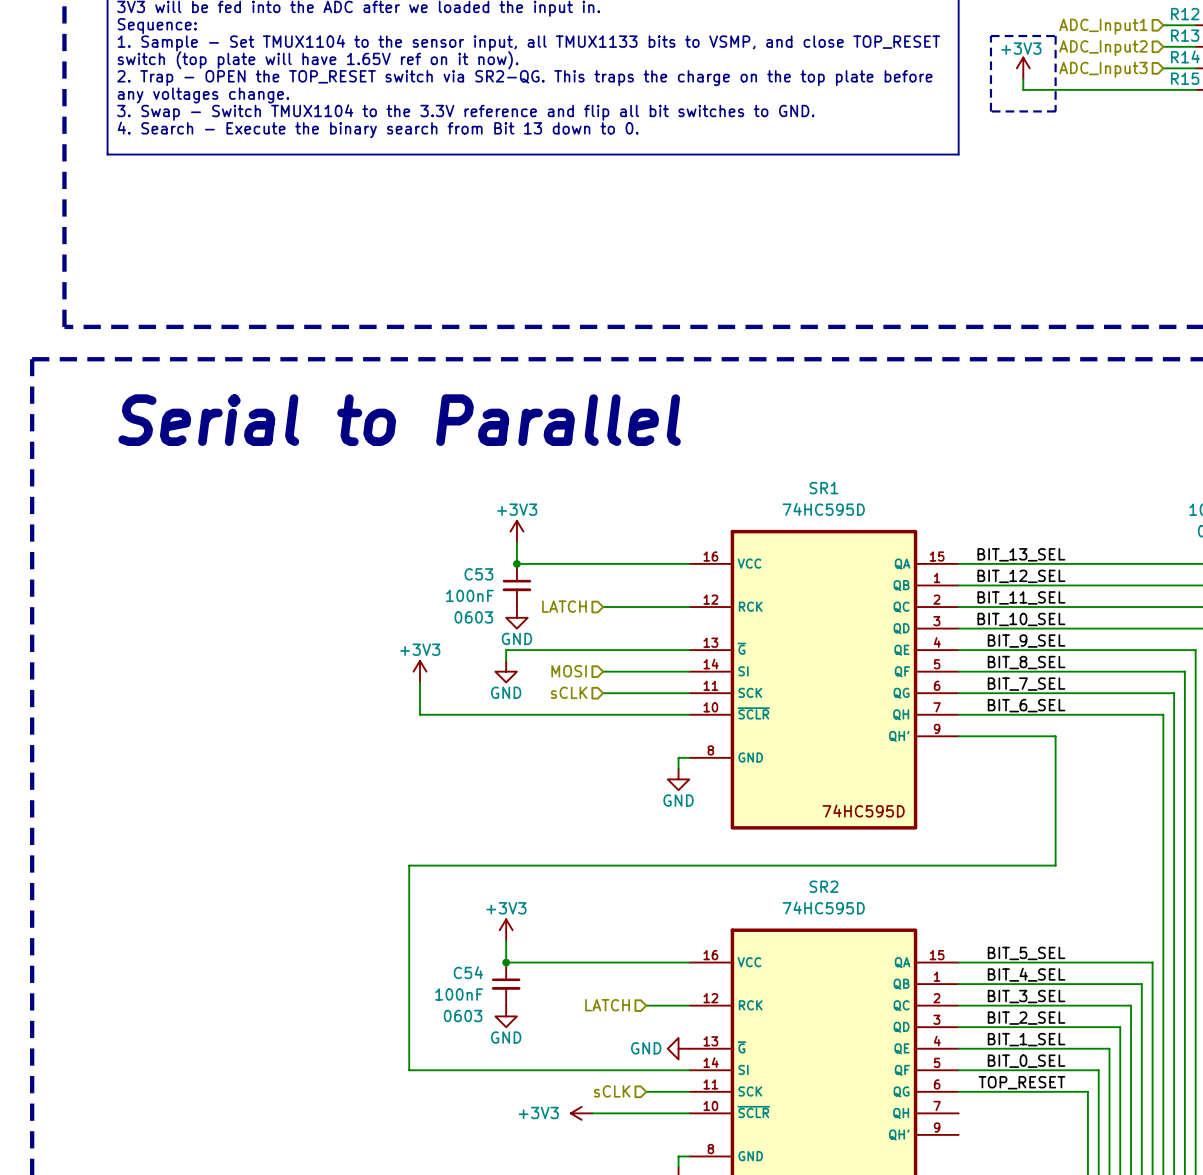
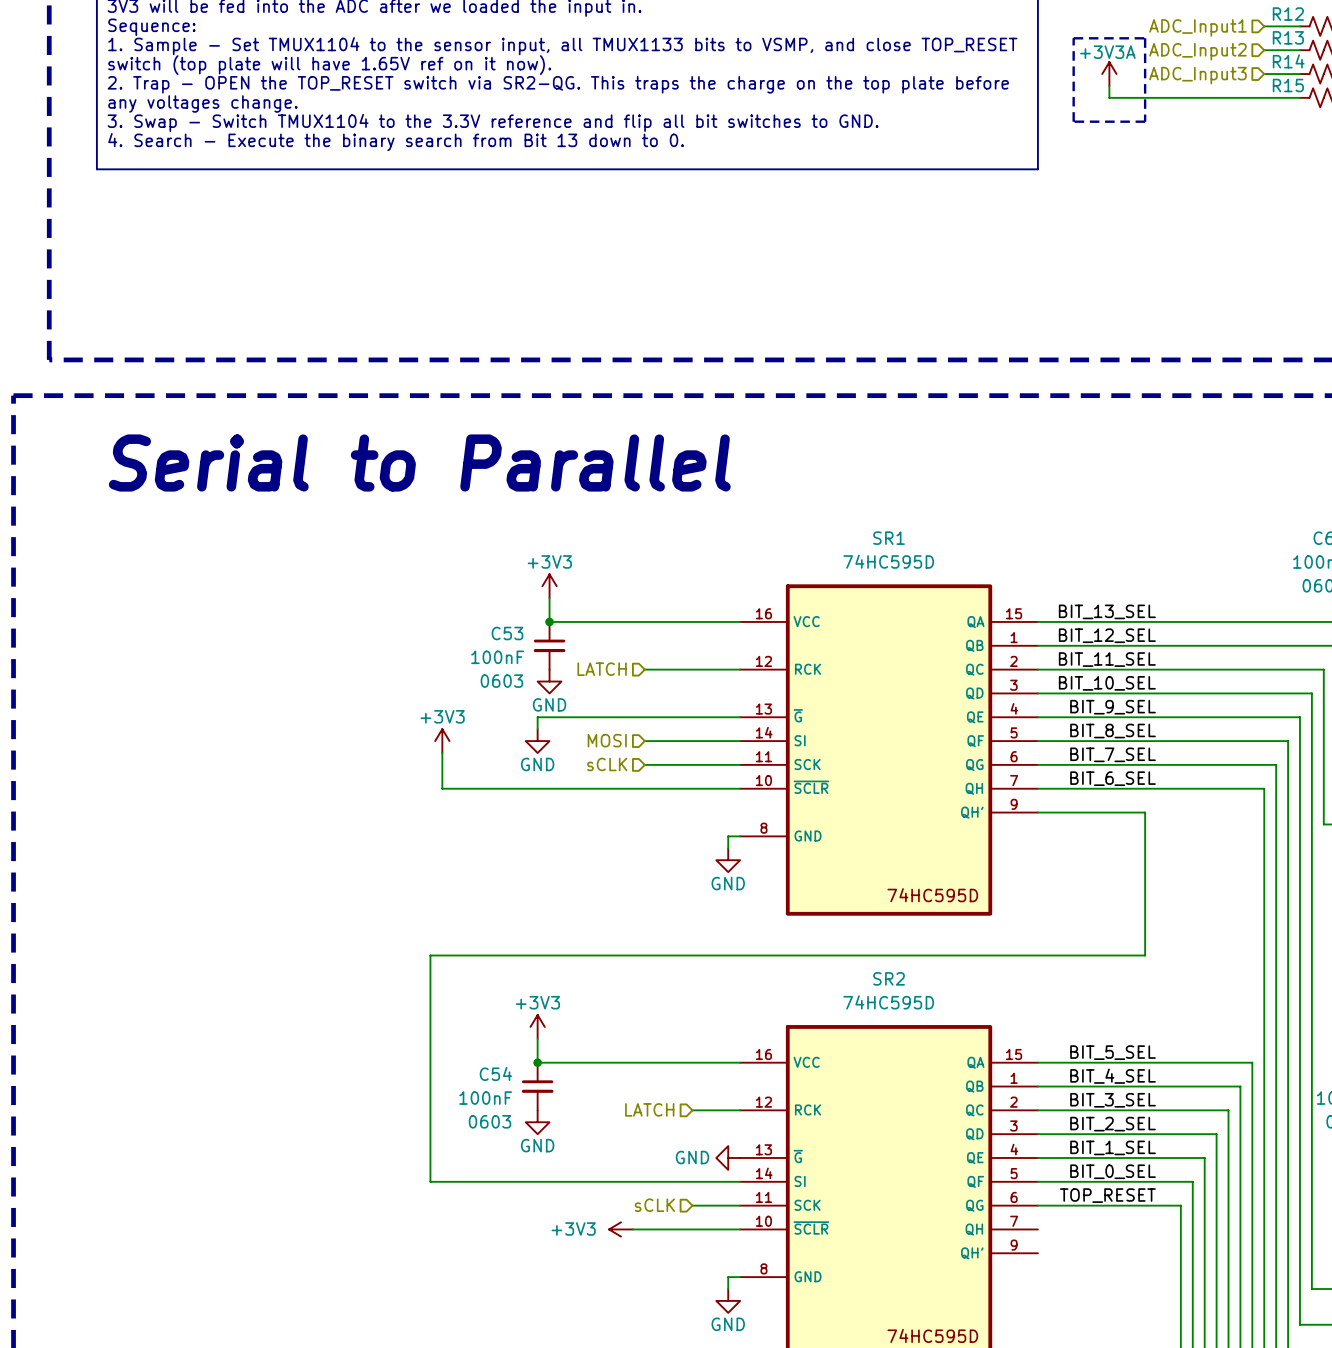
power symbol: +3V3 (1023, 68) -> +3V3A (1109, 74)

